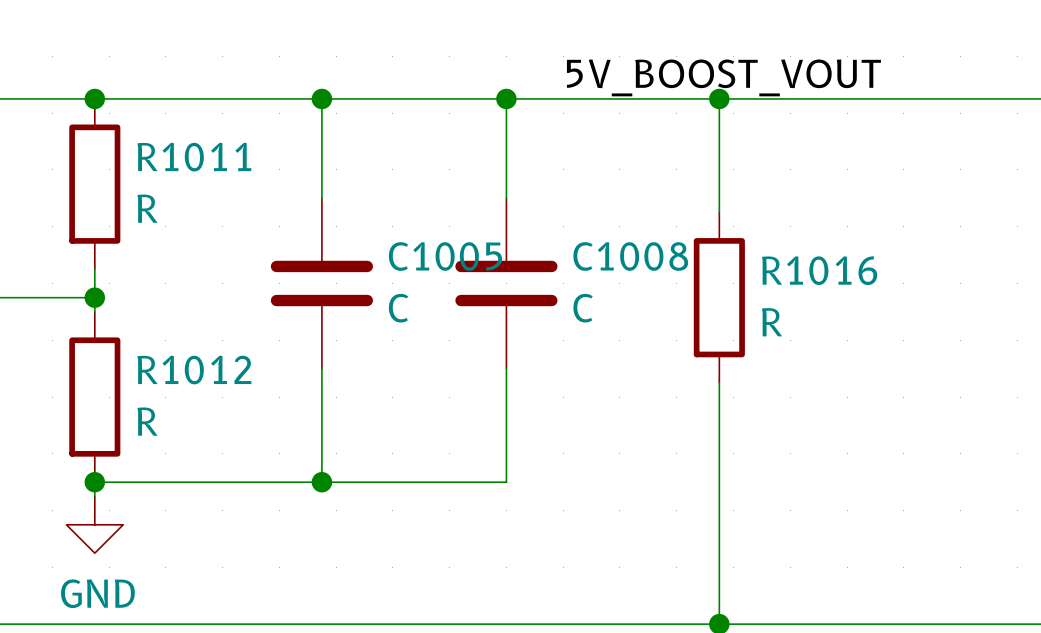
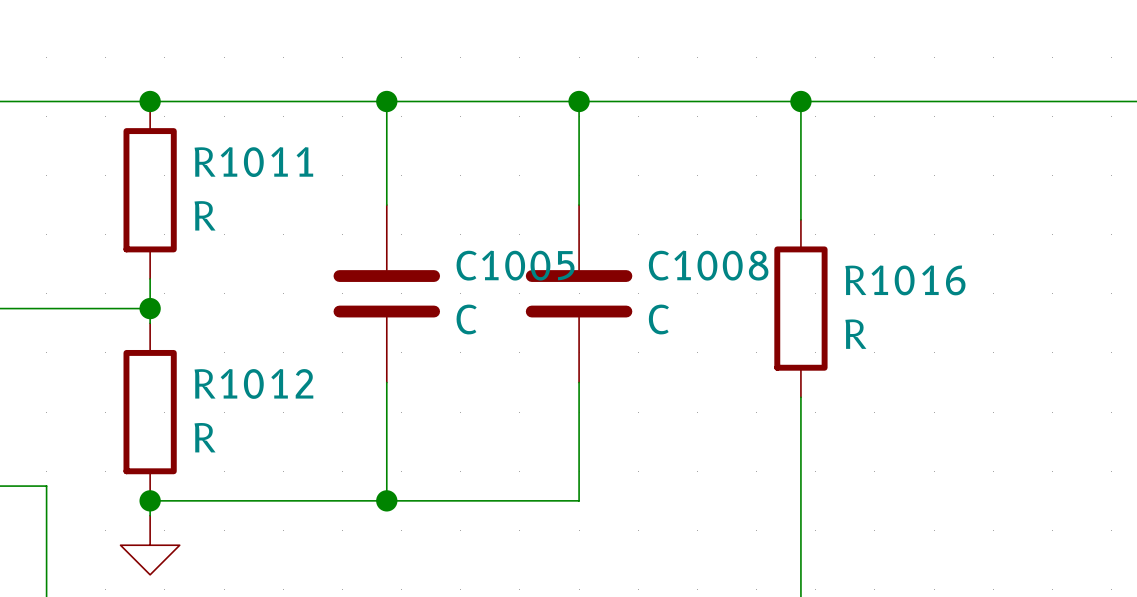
label: 5V_BOOST_VOUT (723, 77) -> none

